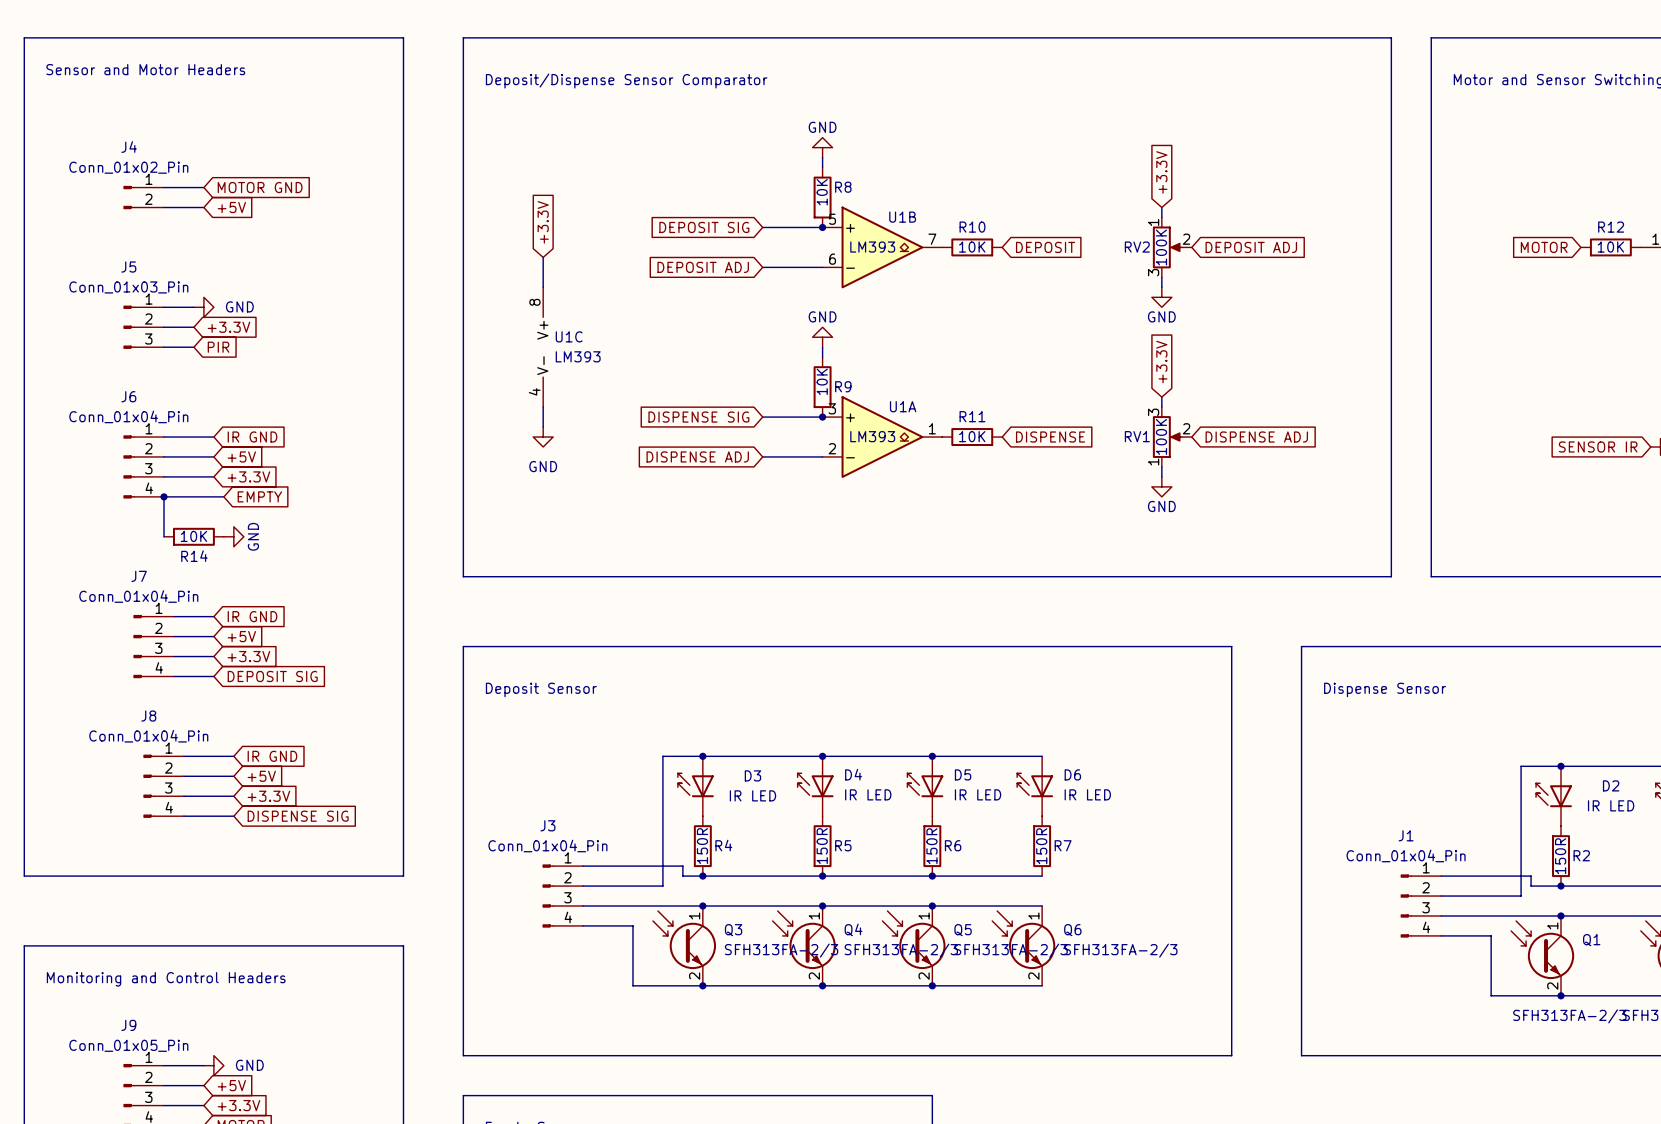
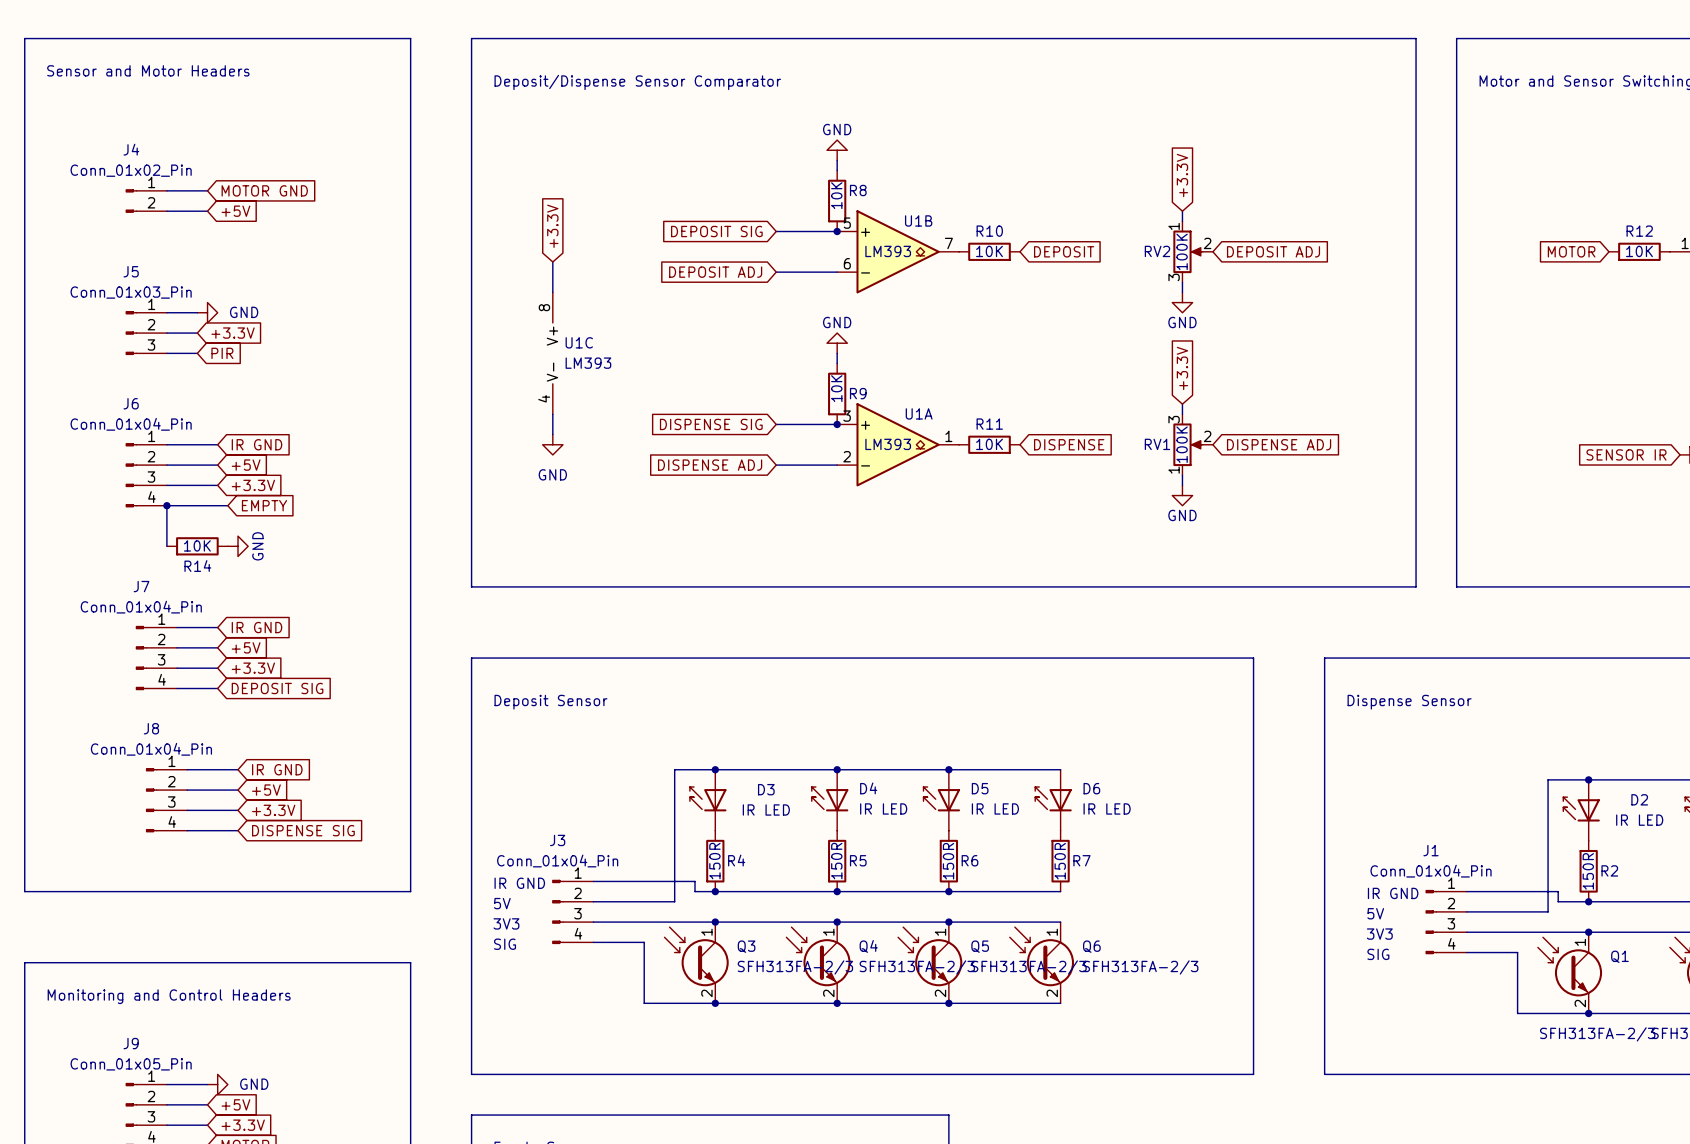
text: none -> IR GND (519, 883)
text: none -> IR GND (1393, 893)
text: none -> 5V (502, 903)
text: none -> 5V (1375, 913)
text: none -> 3V3 (506, 923)
text: none -> 3V3 (1379, 934)
text: none -> SIG (505, 944)
text: none -> SIG (1378, 954)

